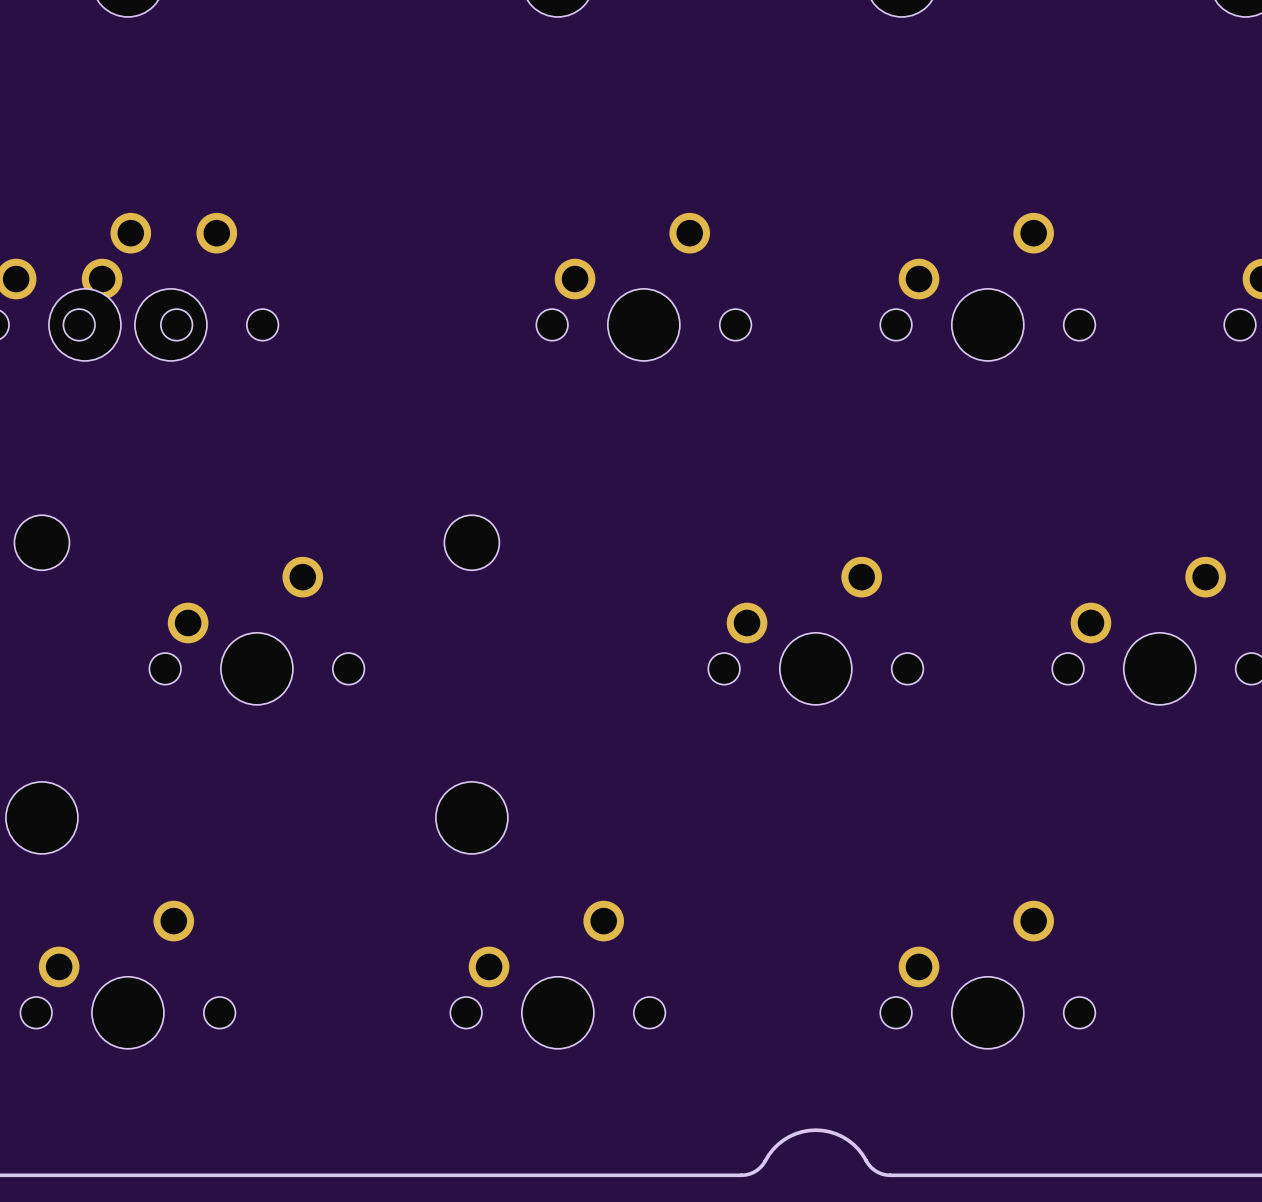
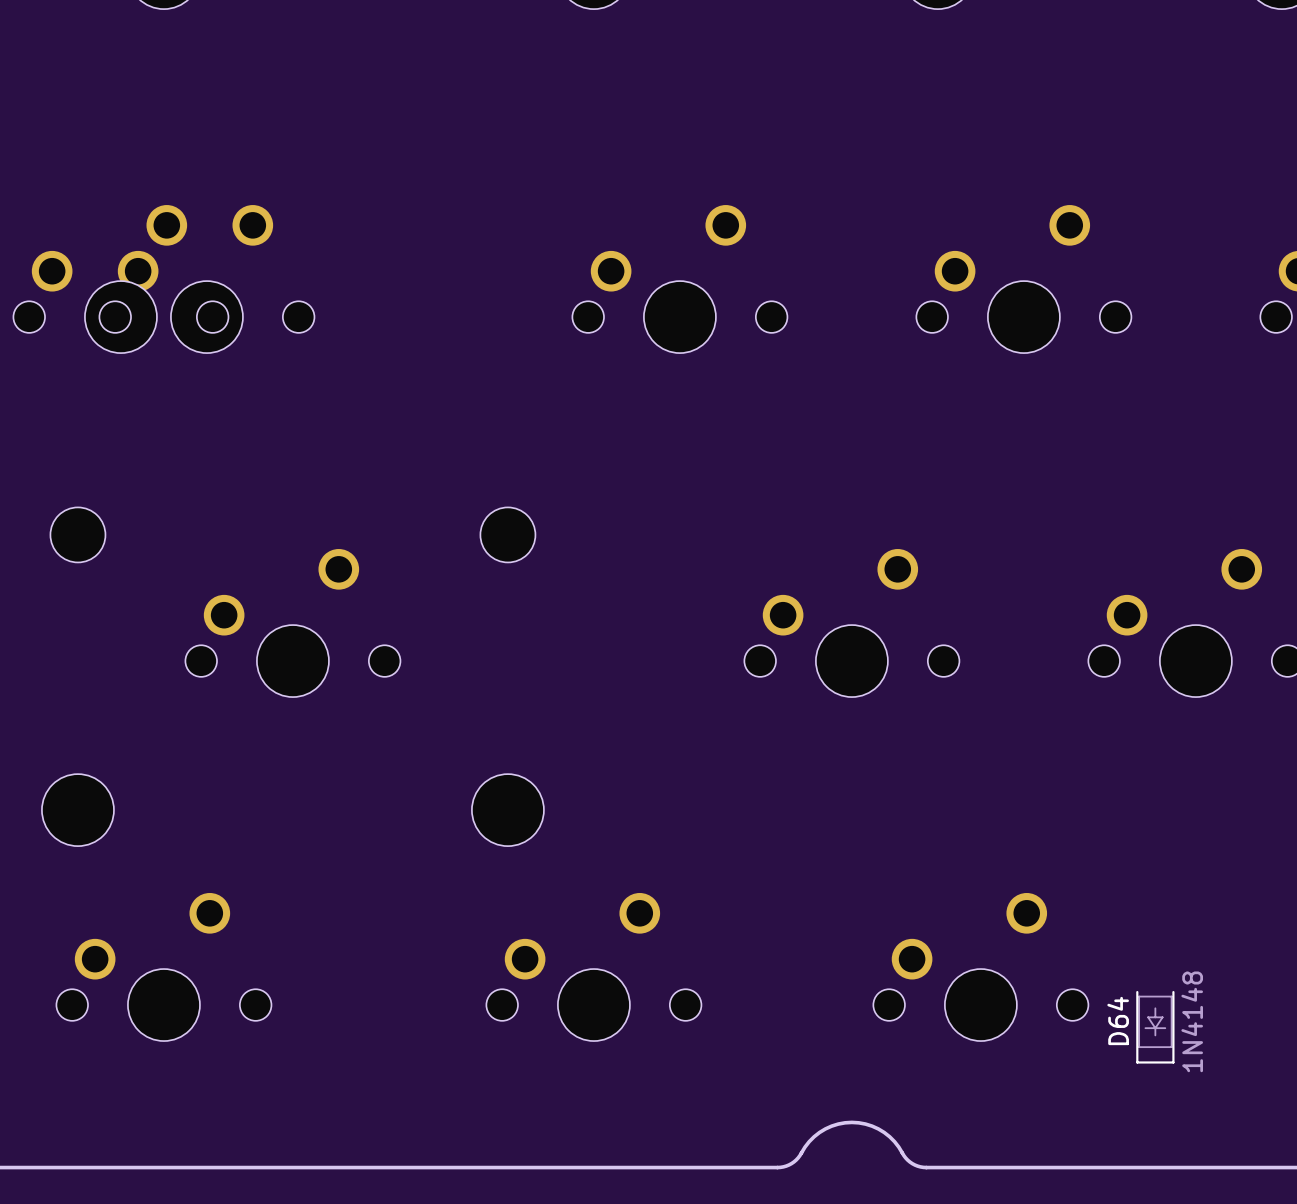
part position: (987, 974) -> (980, 967)
D64: none -> 1N4148 (1155, 1027)

